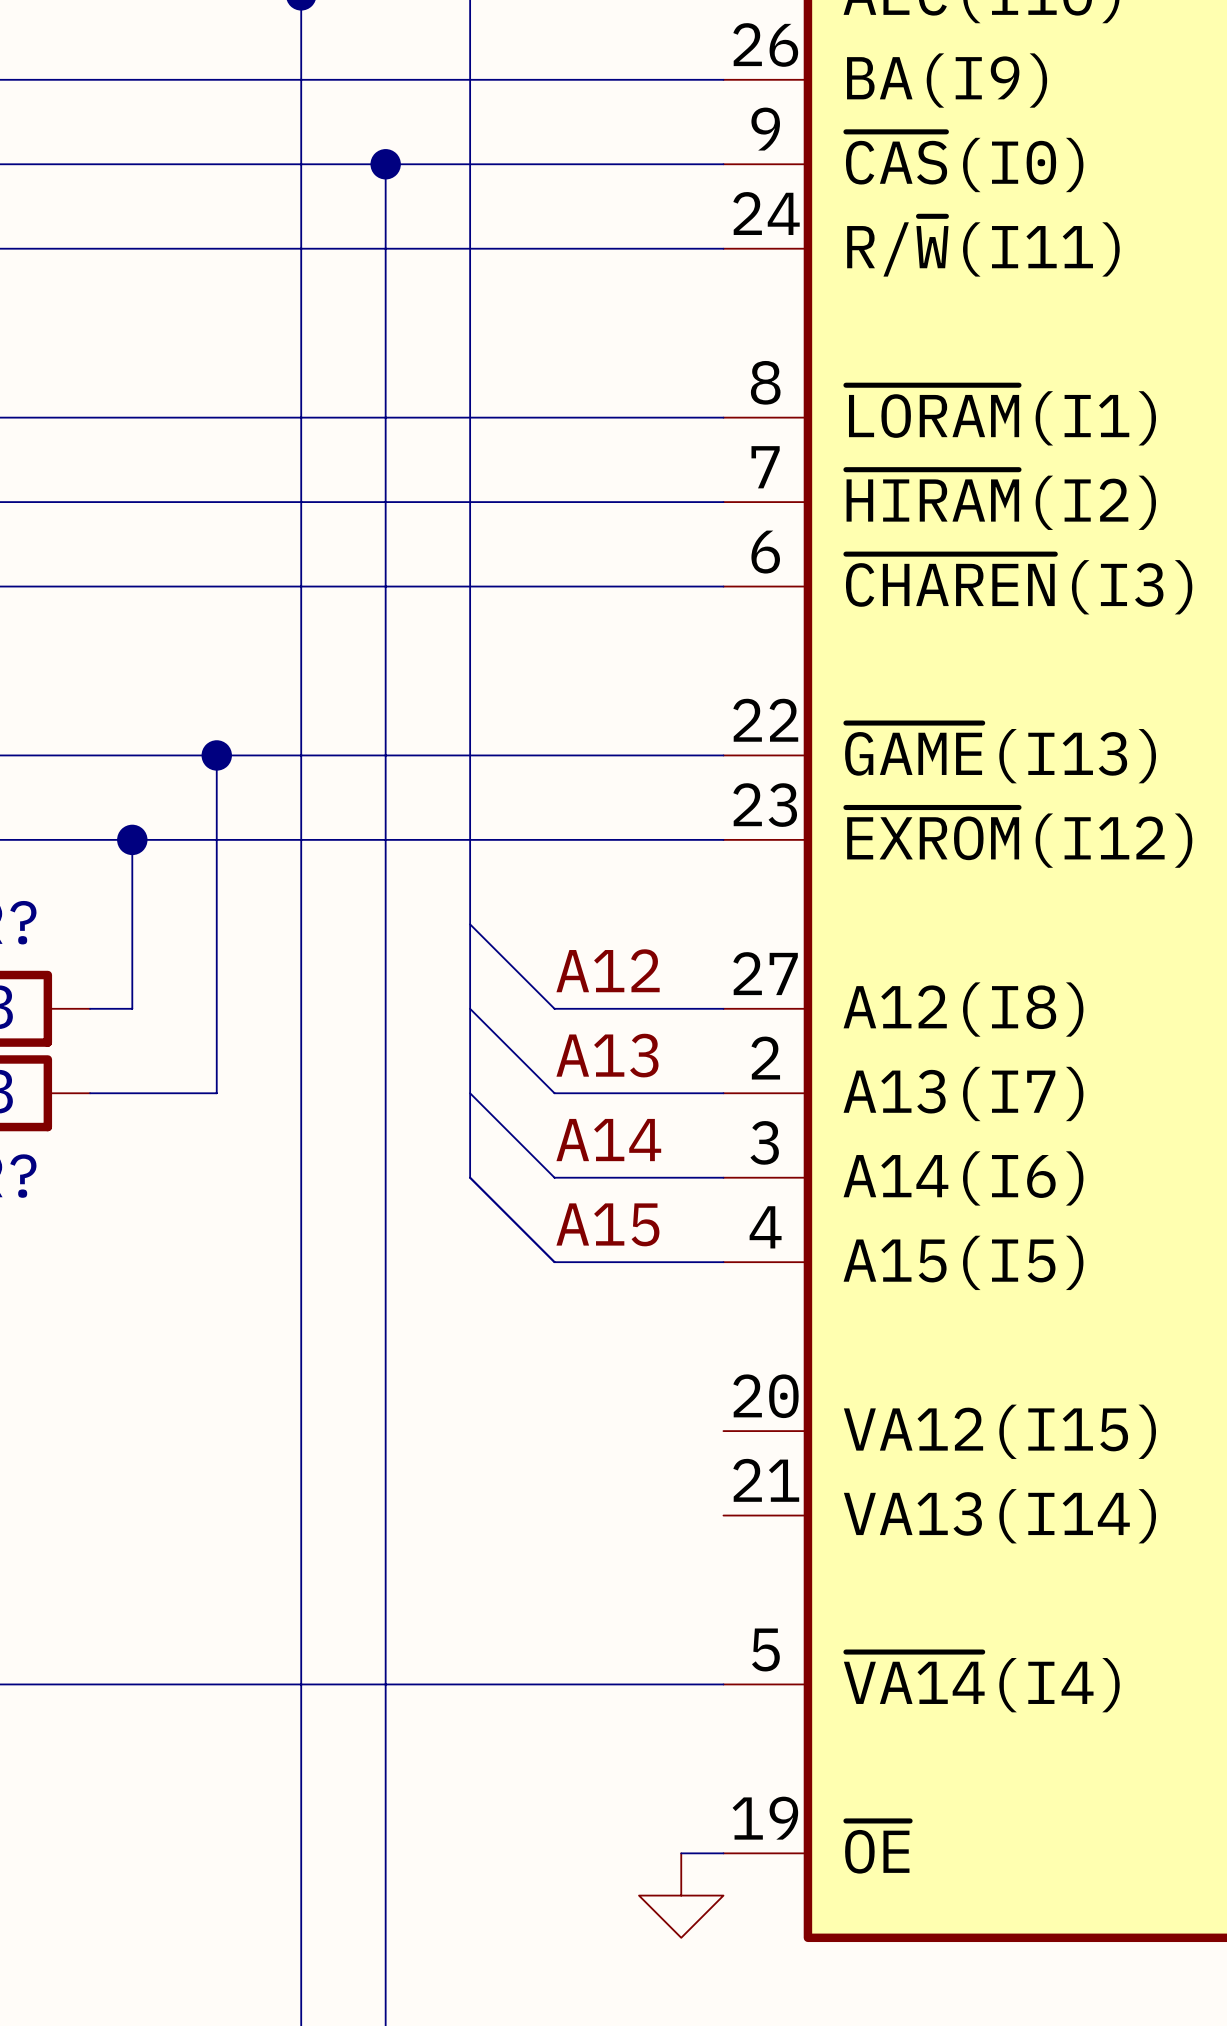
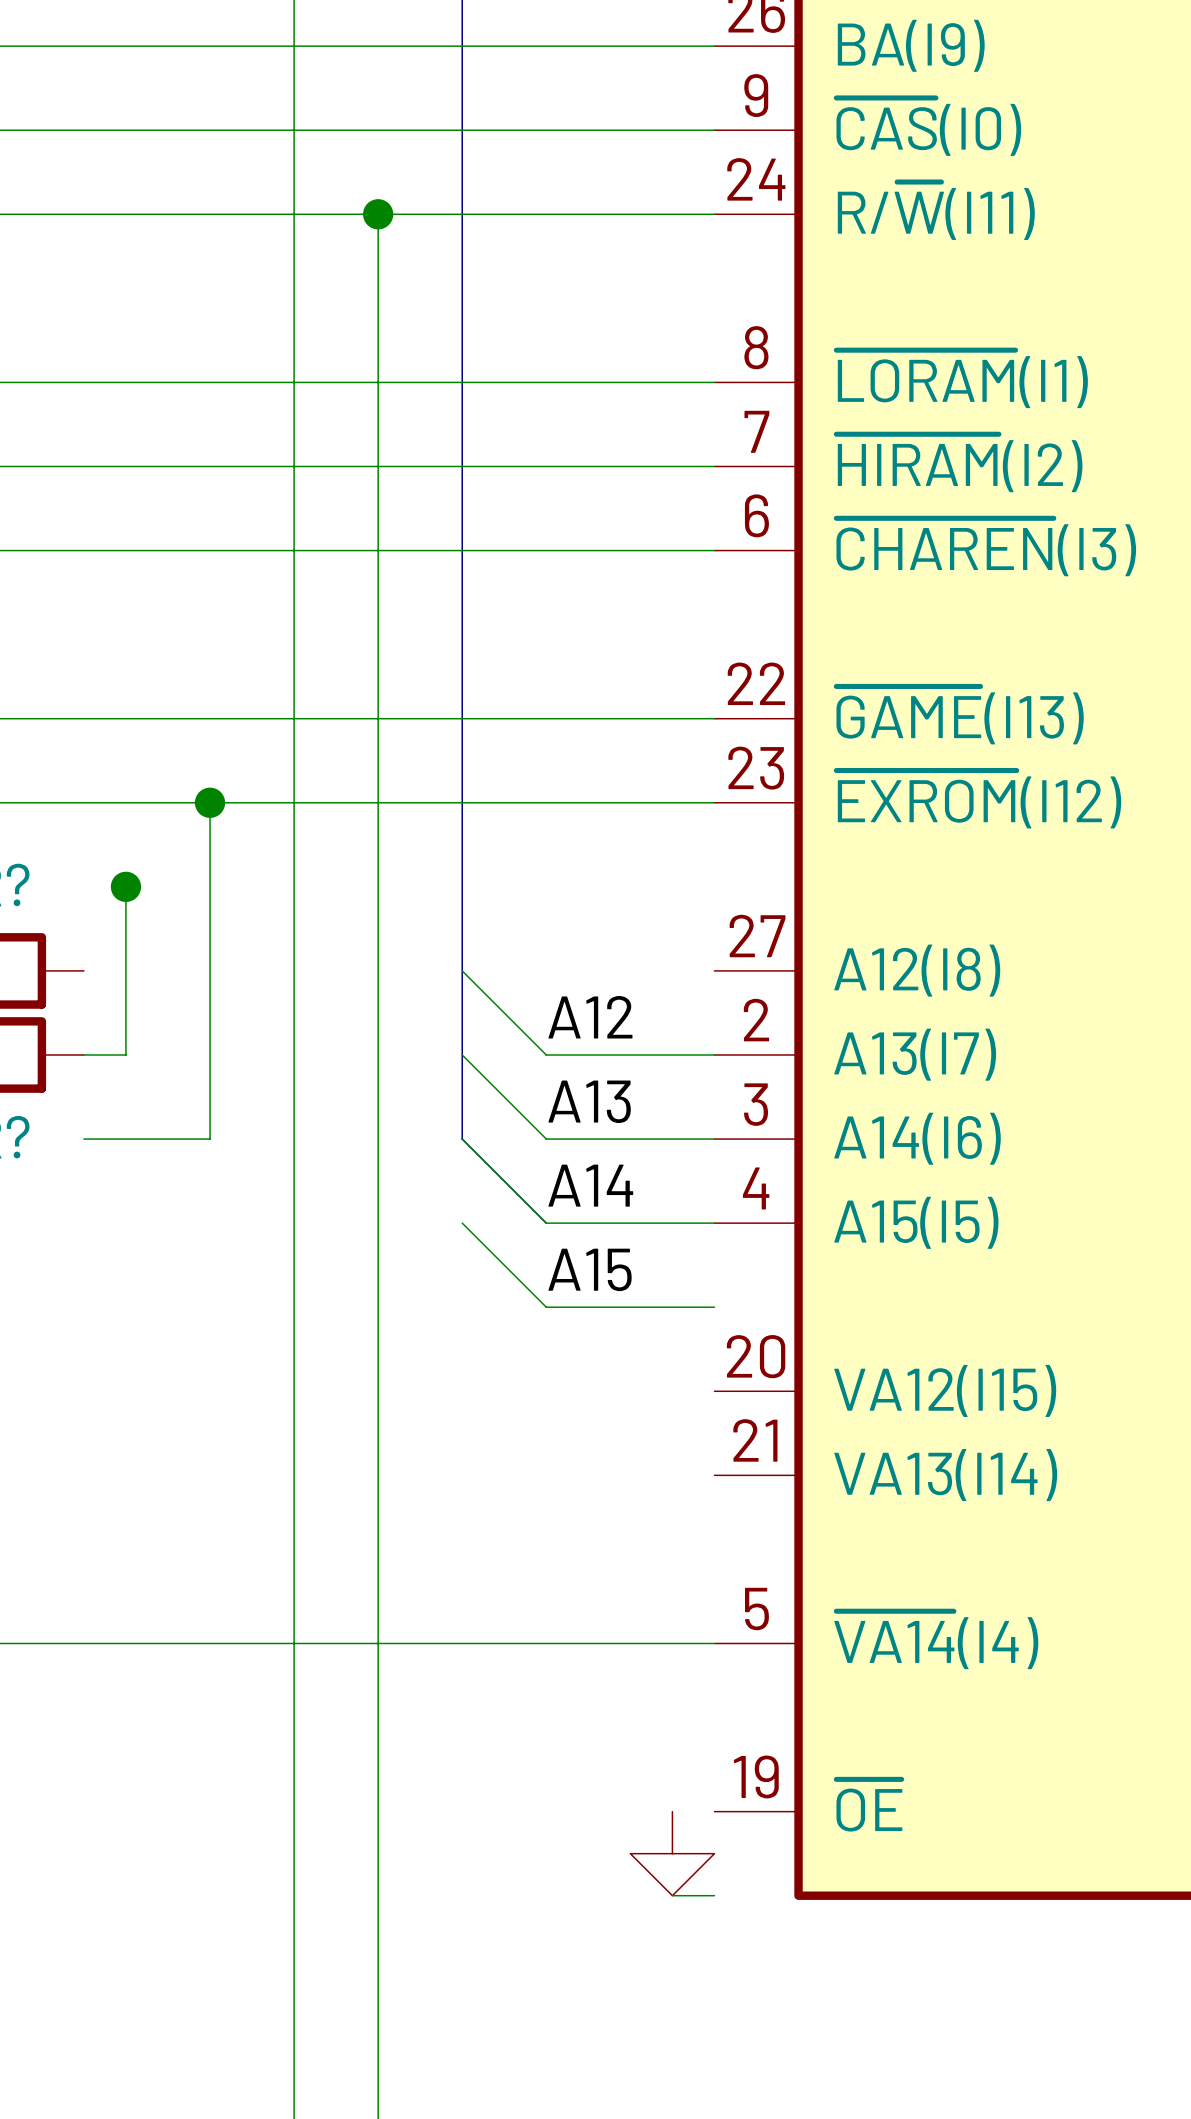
wire: (385, 164) (385, 248) -> none
junction position: (385, 164) -> (378, 214)
wire: (216, 755) (216, 839) -> none
junction: (216, 755) -> none
wire: (132, 839) (132, 924) -> none
junction: (132, 839) -> none
junction: none -> (210, 802)
junction: none -> (125, 886)
wire: (470, 924) (554, 1008) (723, 1008) -> (462, 1223) (546, 1307) (714, 1307)
label: A12 (608, 970) -> none
wire: (90, 1008) (132, 1008) -> (125, 1054) (125, 970)
label: A13 (607, 1055) -> A12 (590, 1017)
wire: (132, 1093) (216, 1093) -> (83, 1139) (210, 1139) (210, 1054)
label: A14 (608, 1140) -> A13 (589, 1101)
label: A15 (607, 1224) -> A14 (590, 1185)
label: none -> A15 (589, 1269)
wire: (681, 1853) (723, 1853) -> (672, 1895) (714, 1895)

